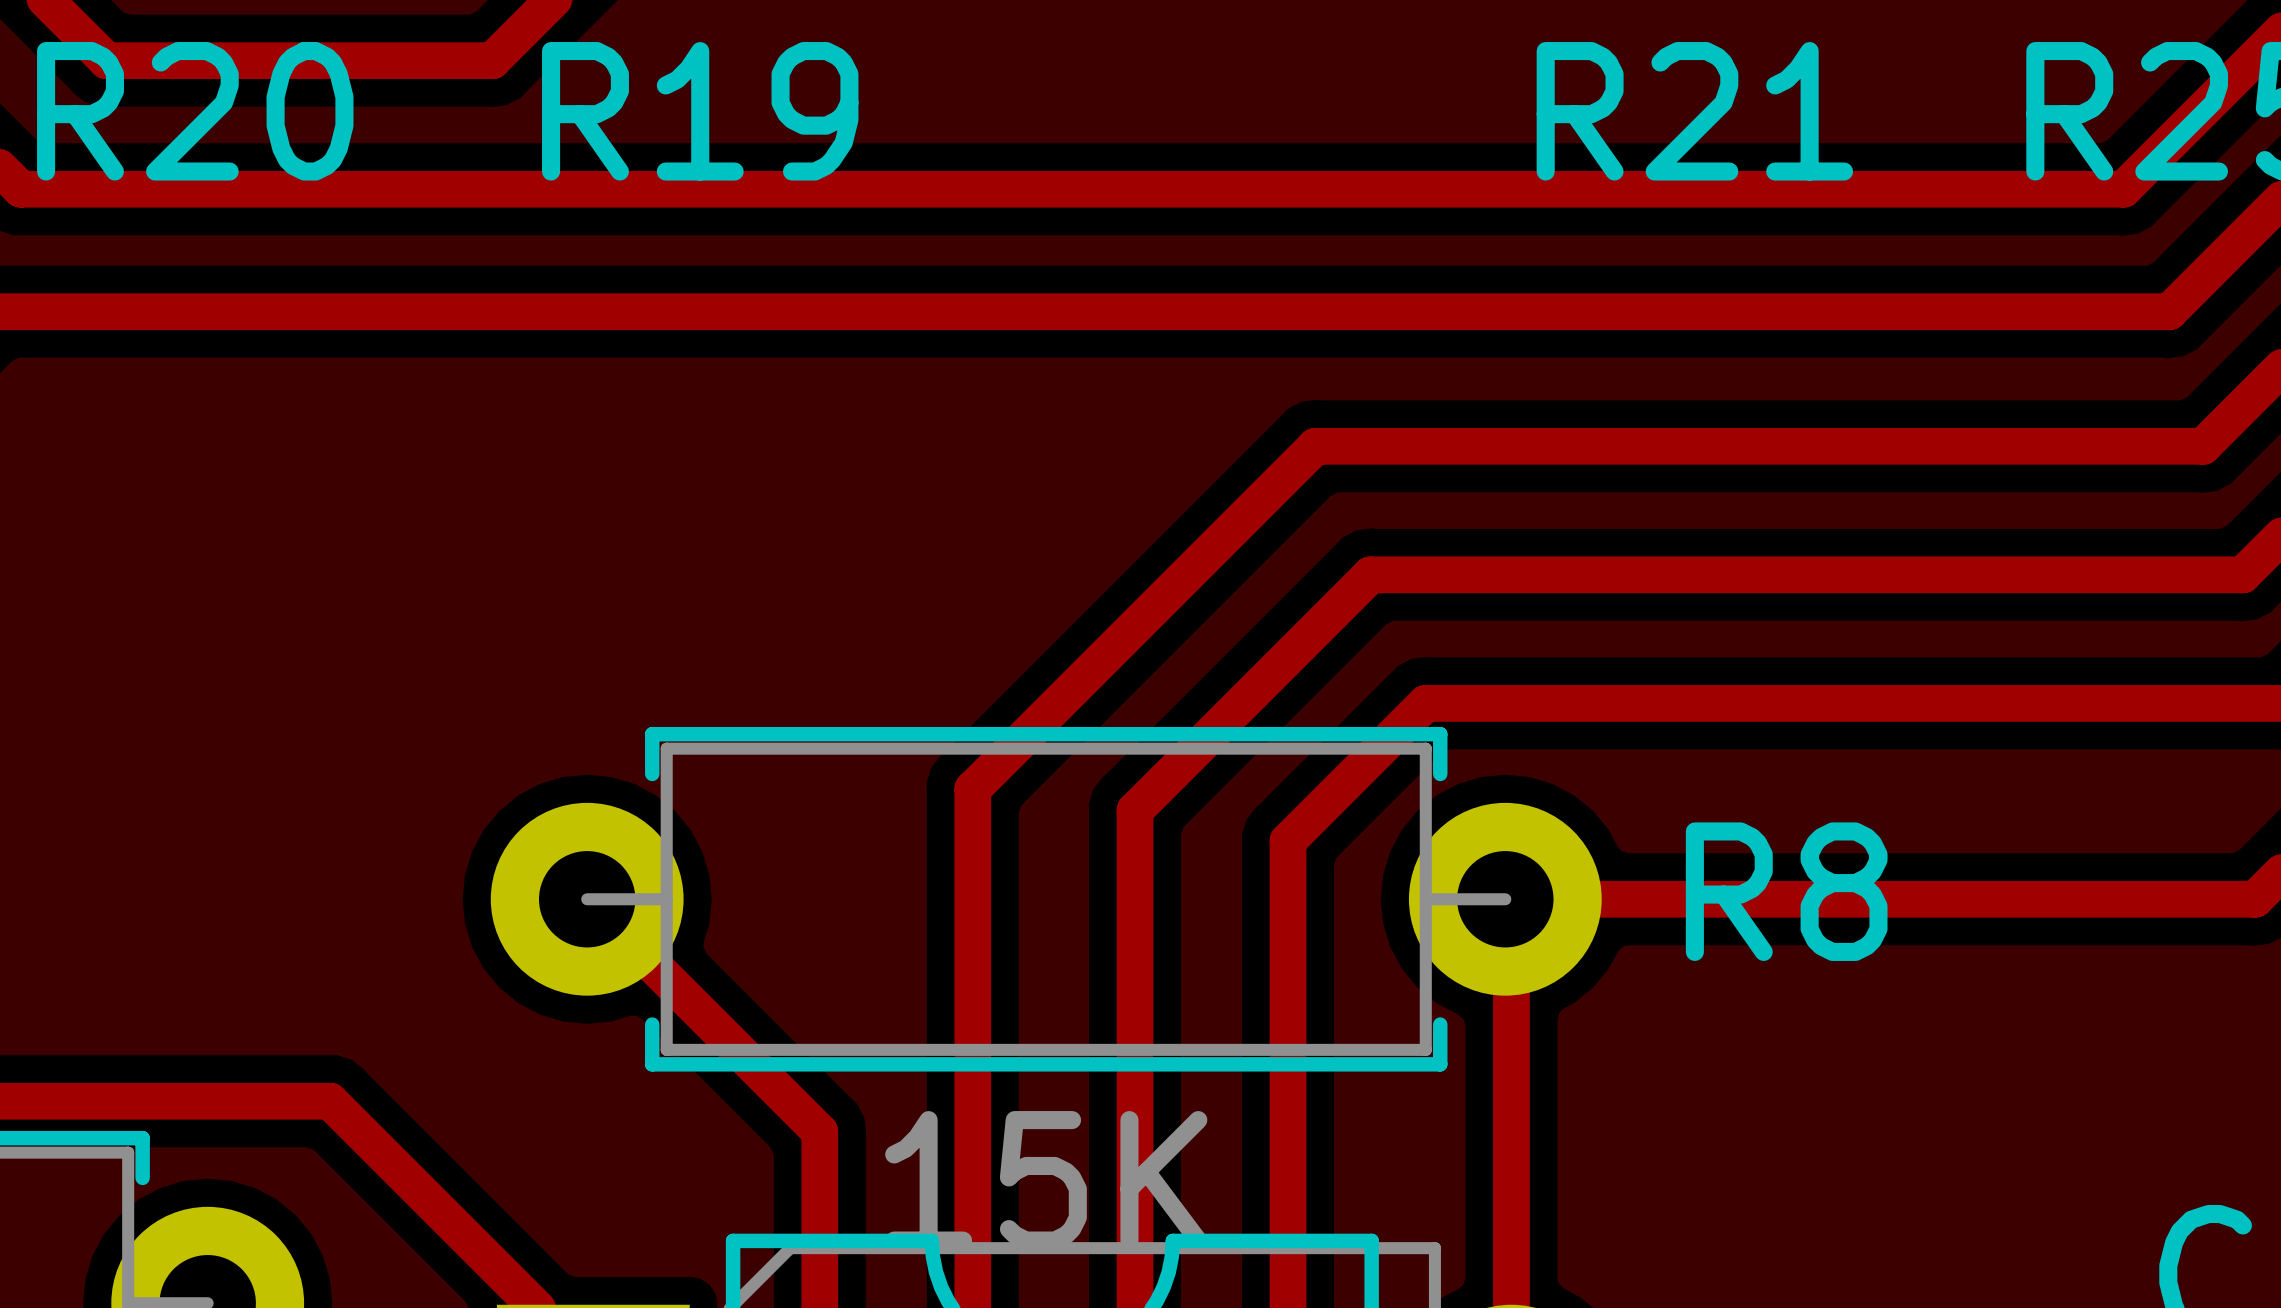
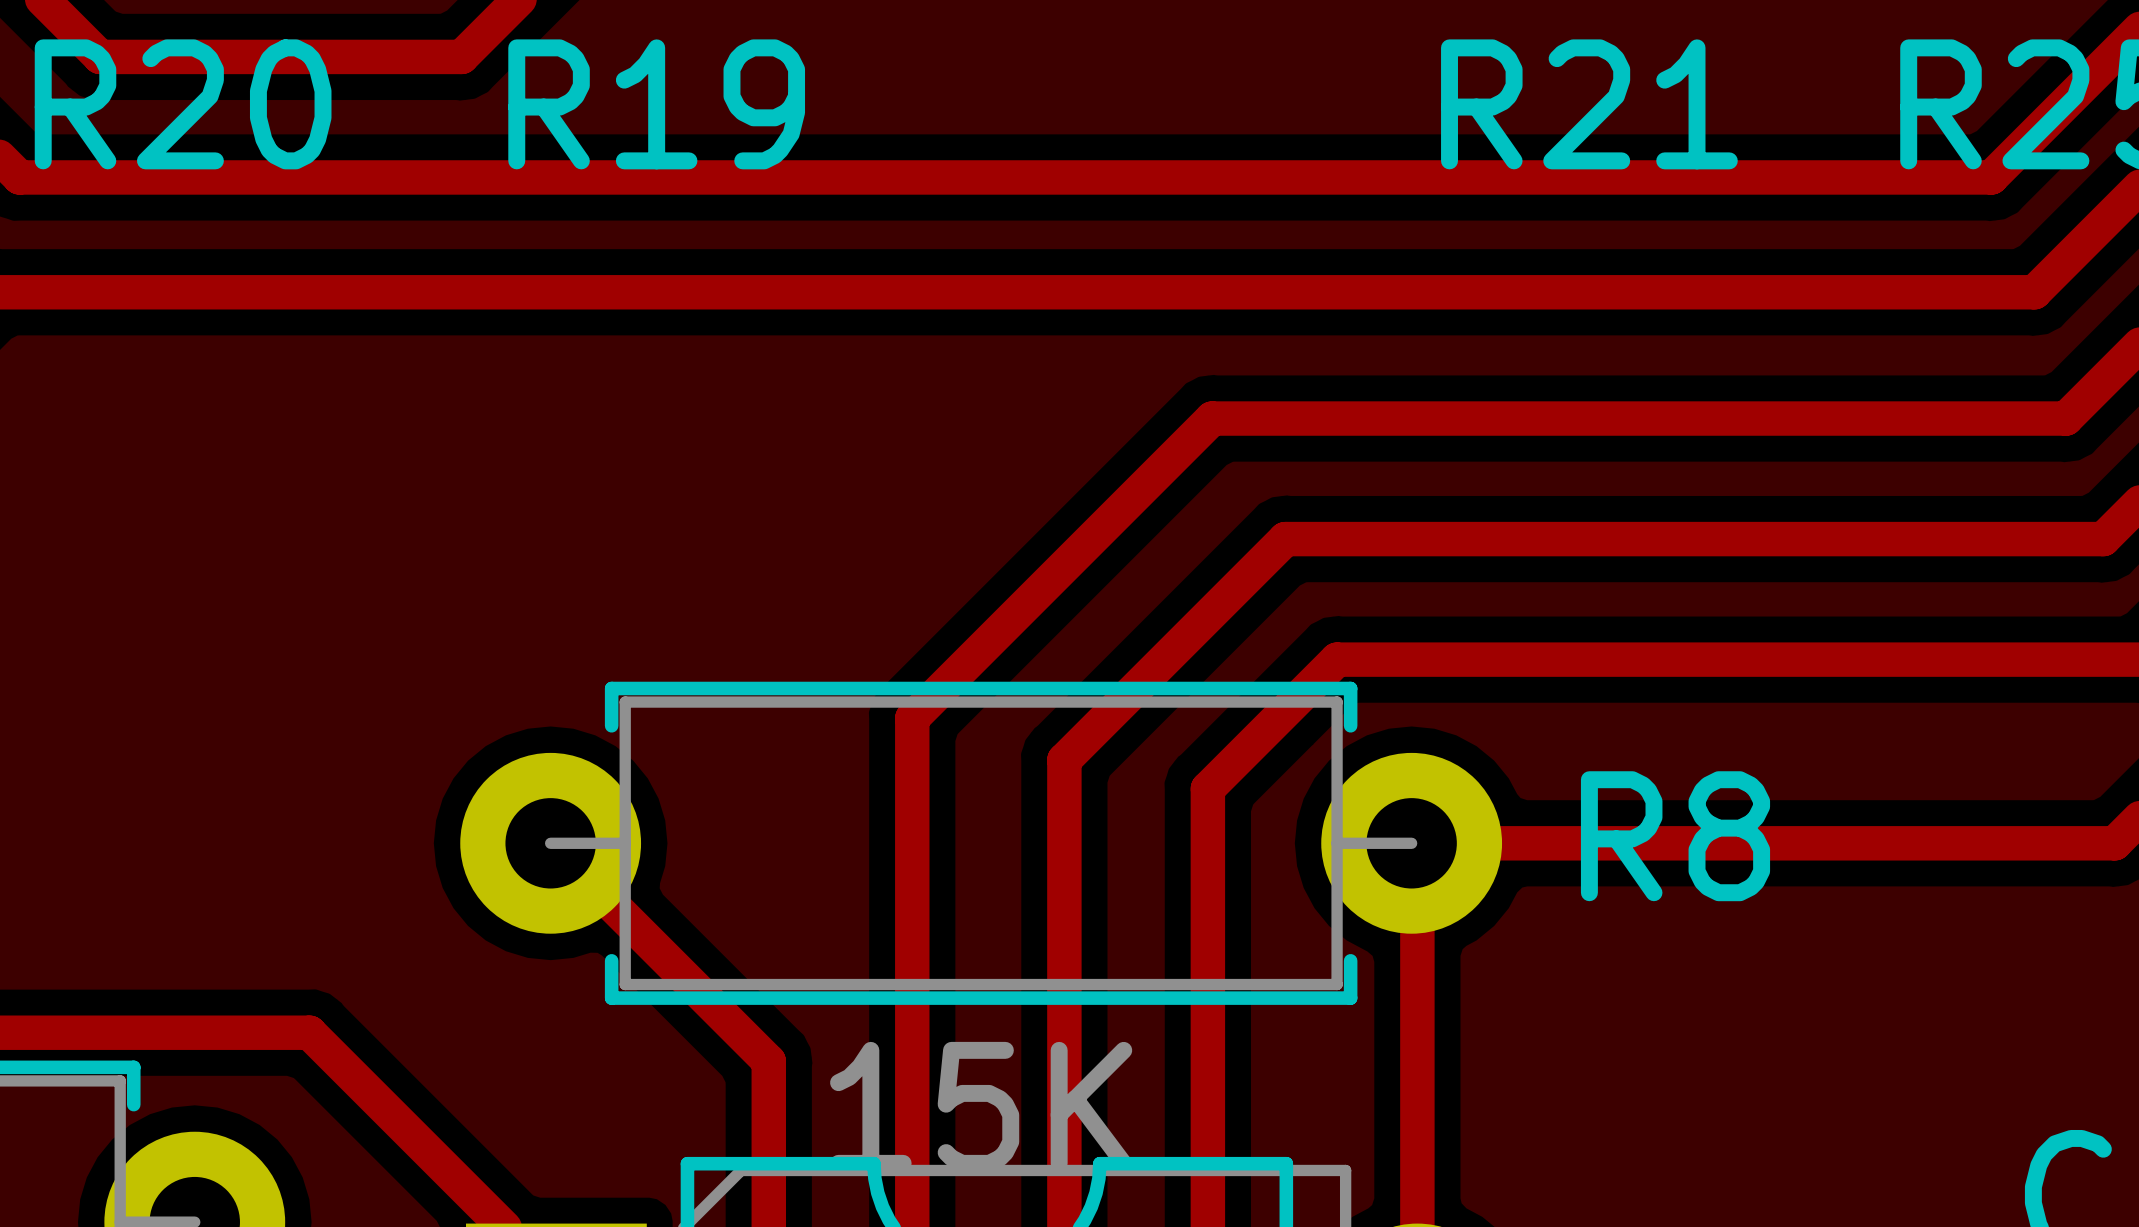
track: (1315, 446) (972, 789) -> (1233, 418) (1212, 418) (912, 718) (912, 739)

